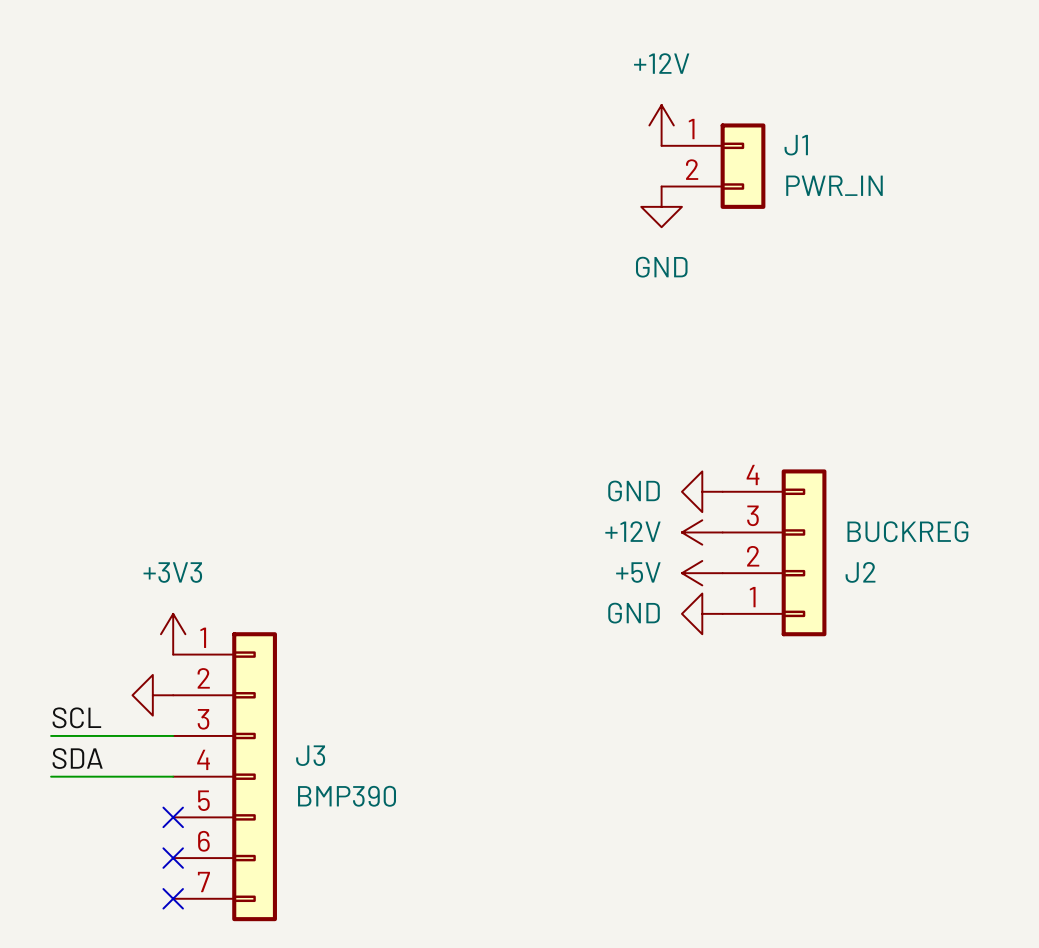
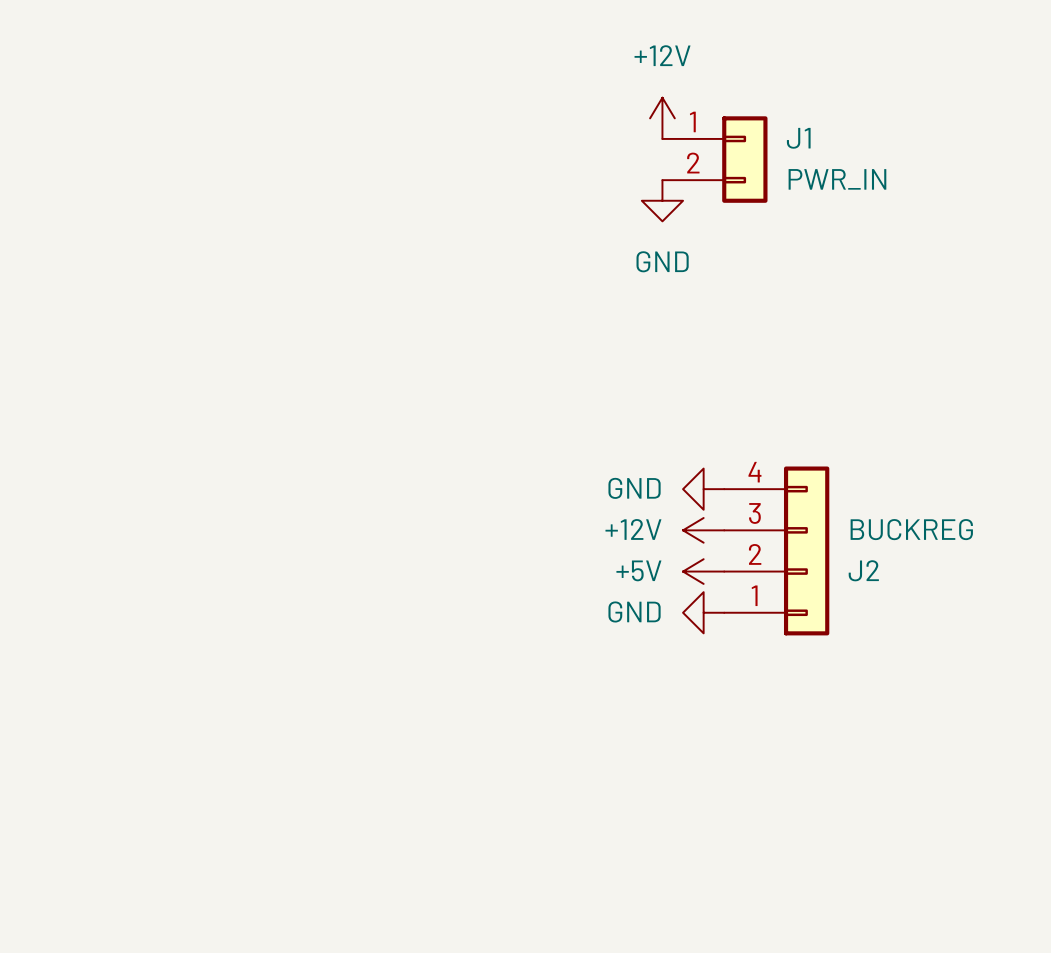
power symbol: +3V3 (173, 634) -> none
power symbol: (152, 695) -> none
label: SCL (76, 717) -> none
wire: (51, 735) (173, 735) -> none
label: SDA (77, 758) -> none
wire: (51, 776) (173, 776) -> none
J3: BMP390 (225, 776) -> none
no-connect mark: (173, 817) -> none
no-connect mark: (173, 858) -> none
no-connect mark: (173, 898) -> none

